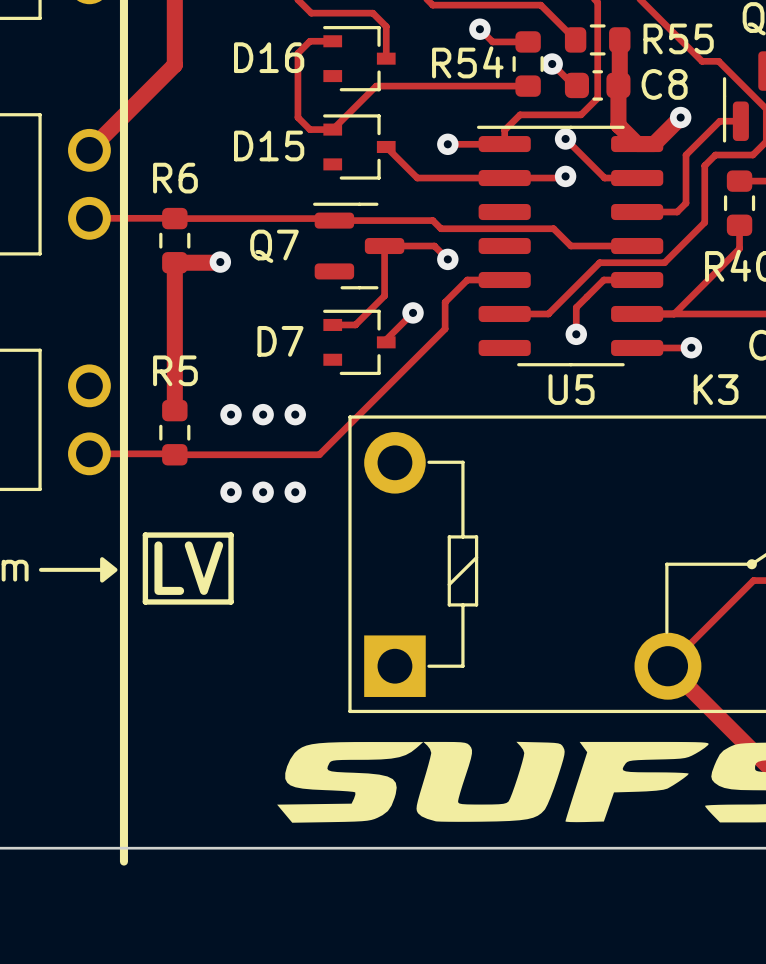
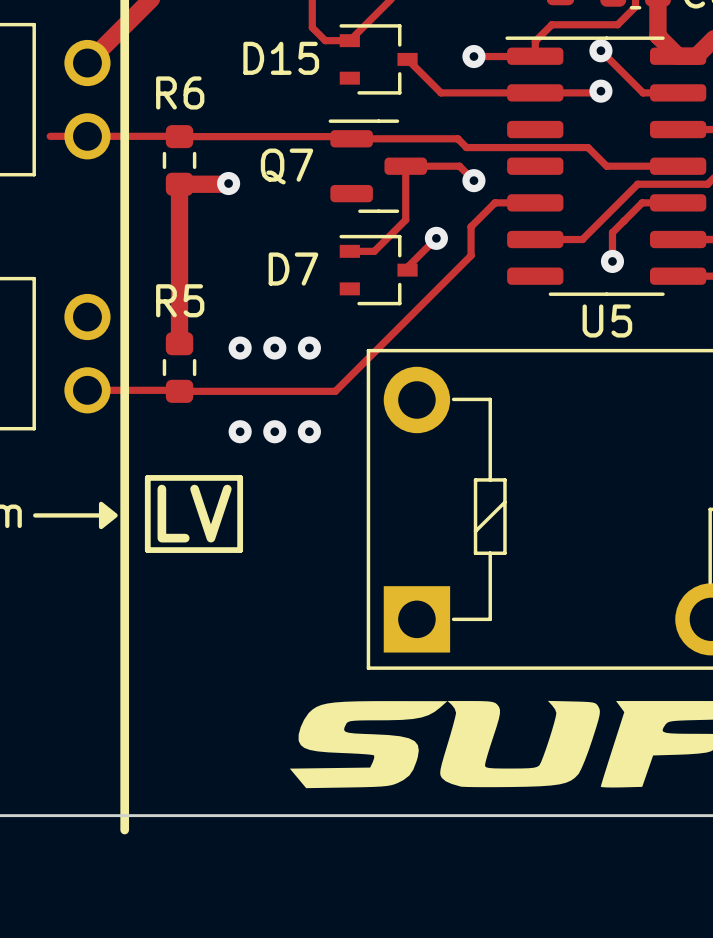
track: none -> (50, 136) (87, 136)

